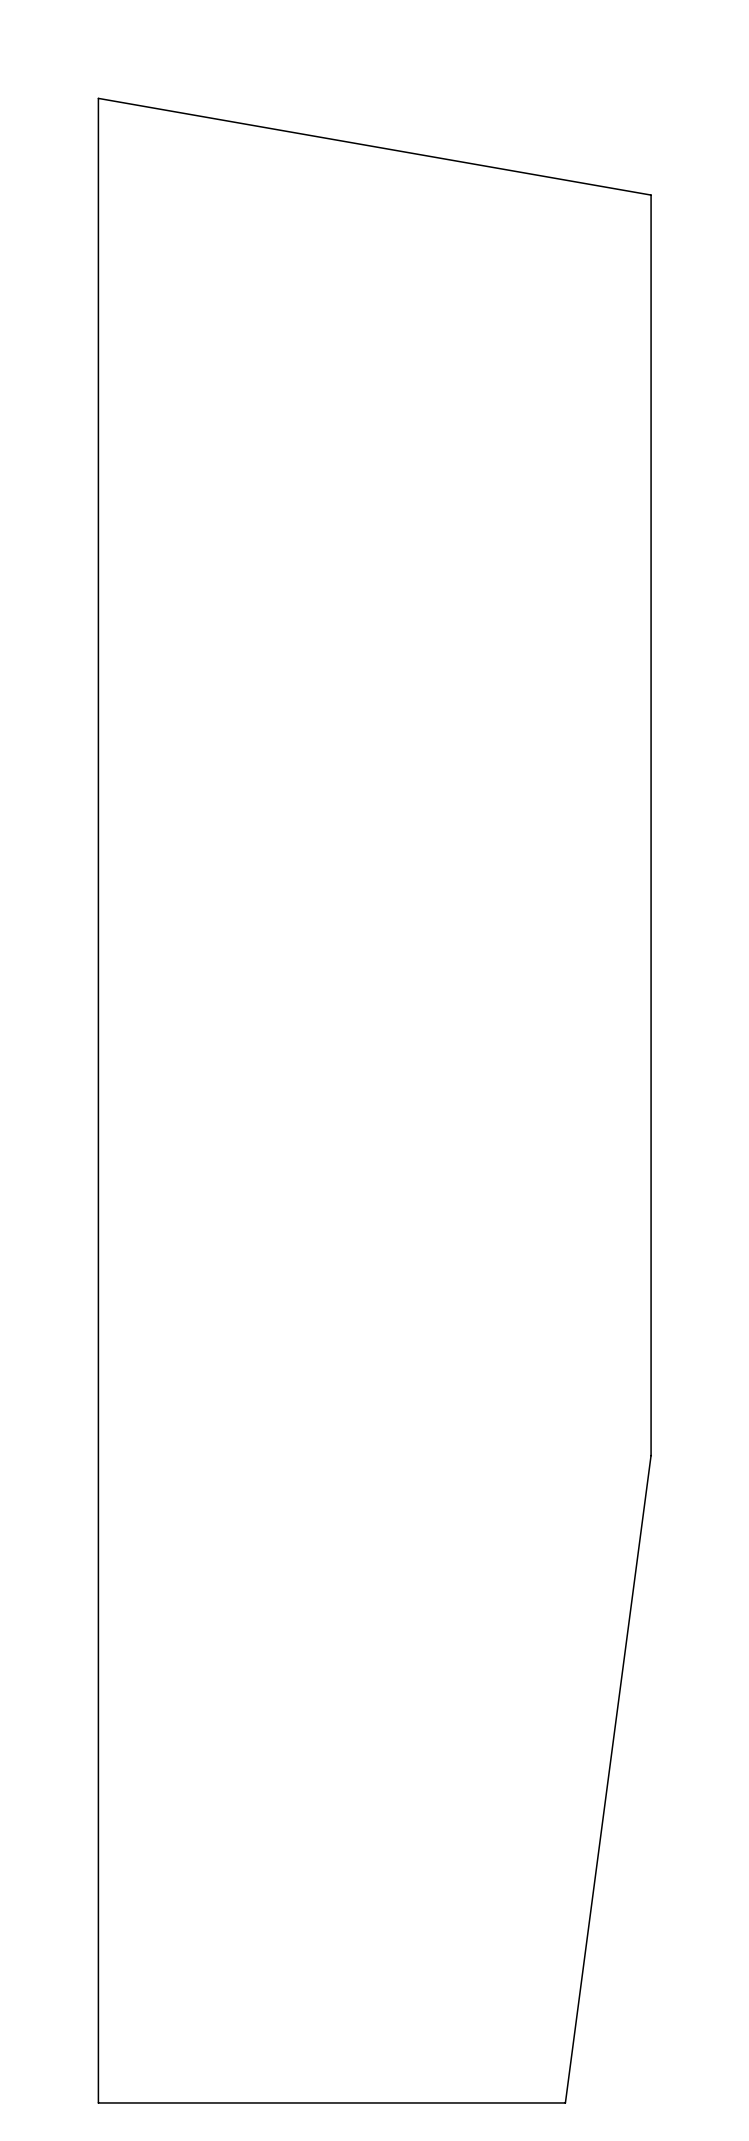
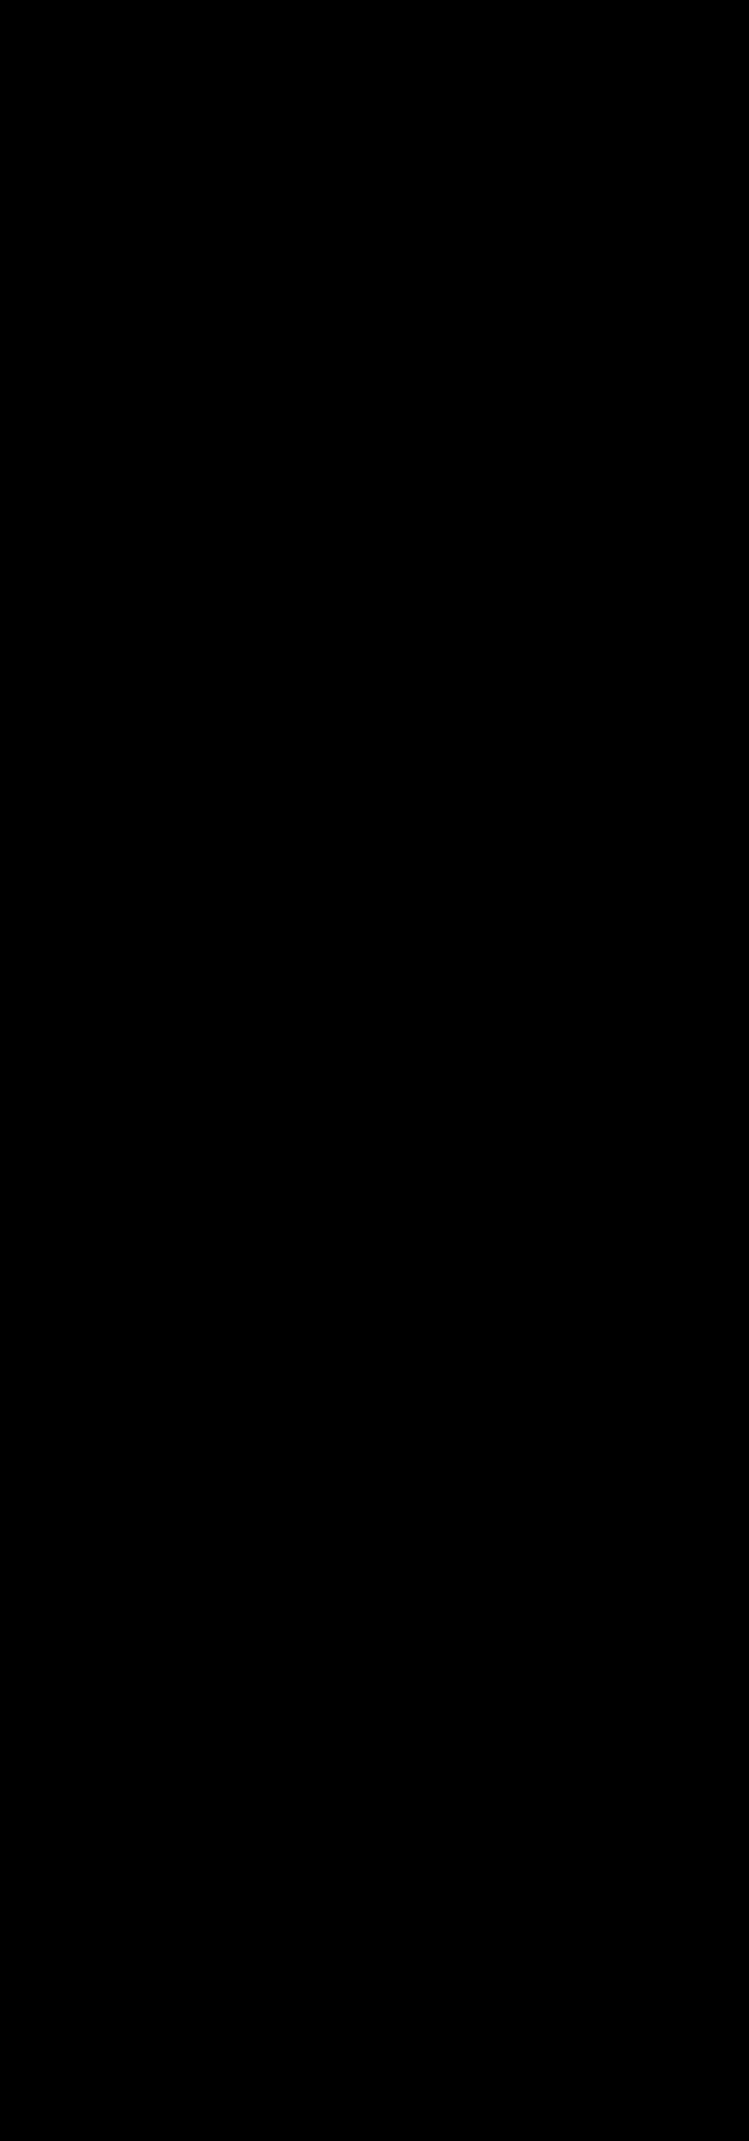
board edge: (98, 98) (98, 2102) (565, 2102) (651, 1455) (651, 195) (98, 98) -> none

